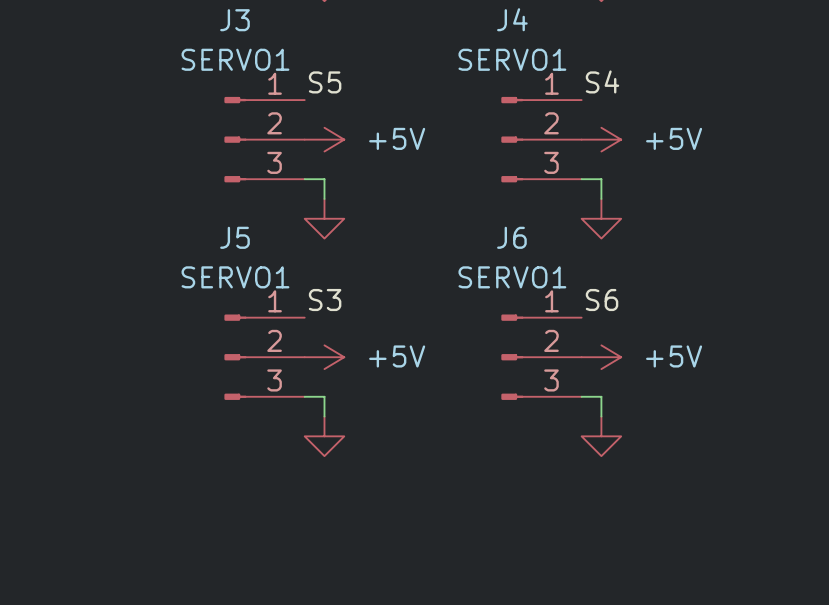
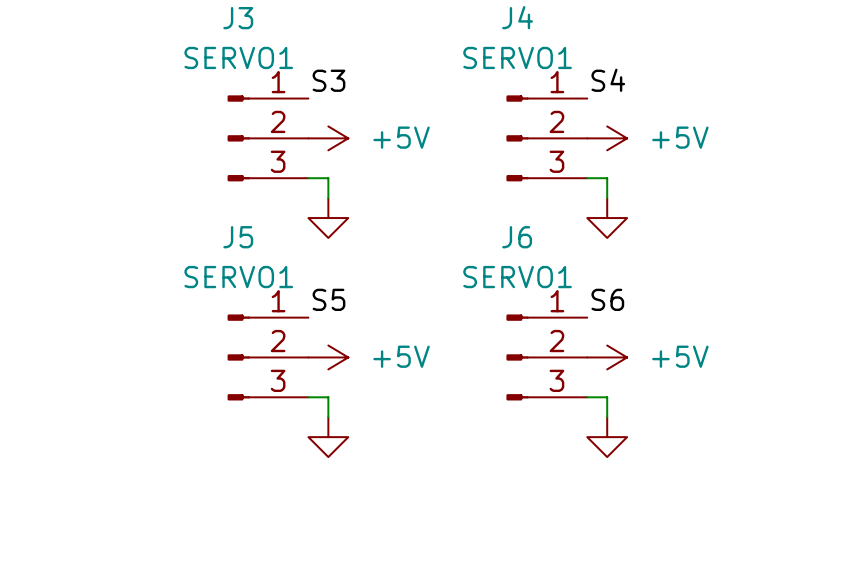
label: S5 (325, 82) -> S3 (328, 80)
label: S3 (325, 300) -> S5 (328, 299)

